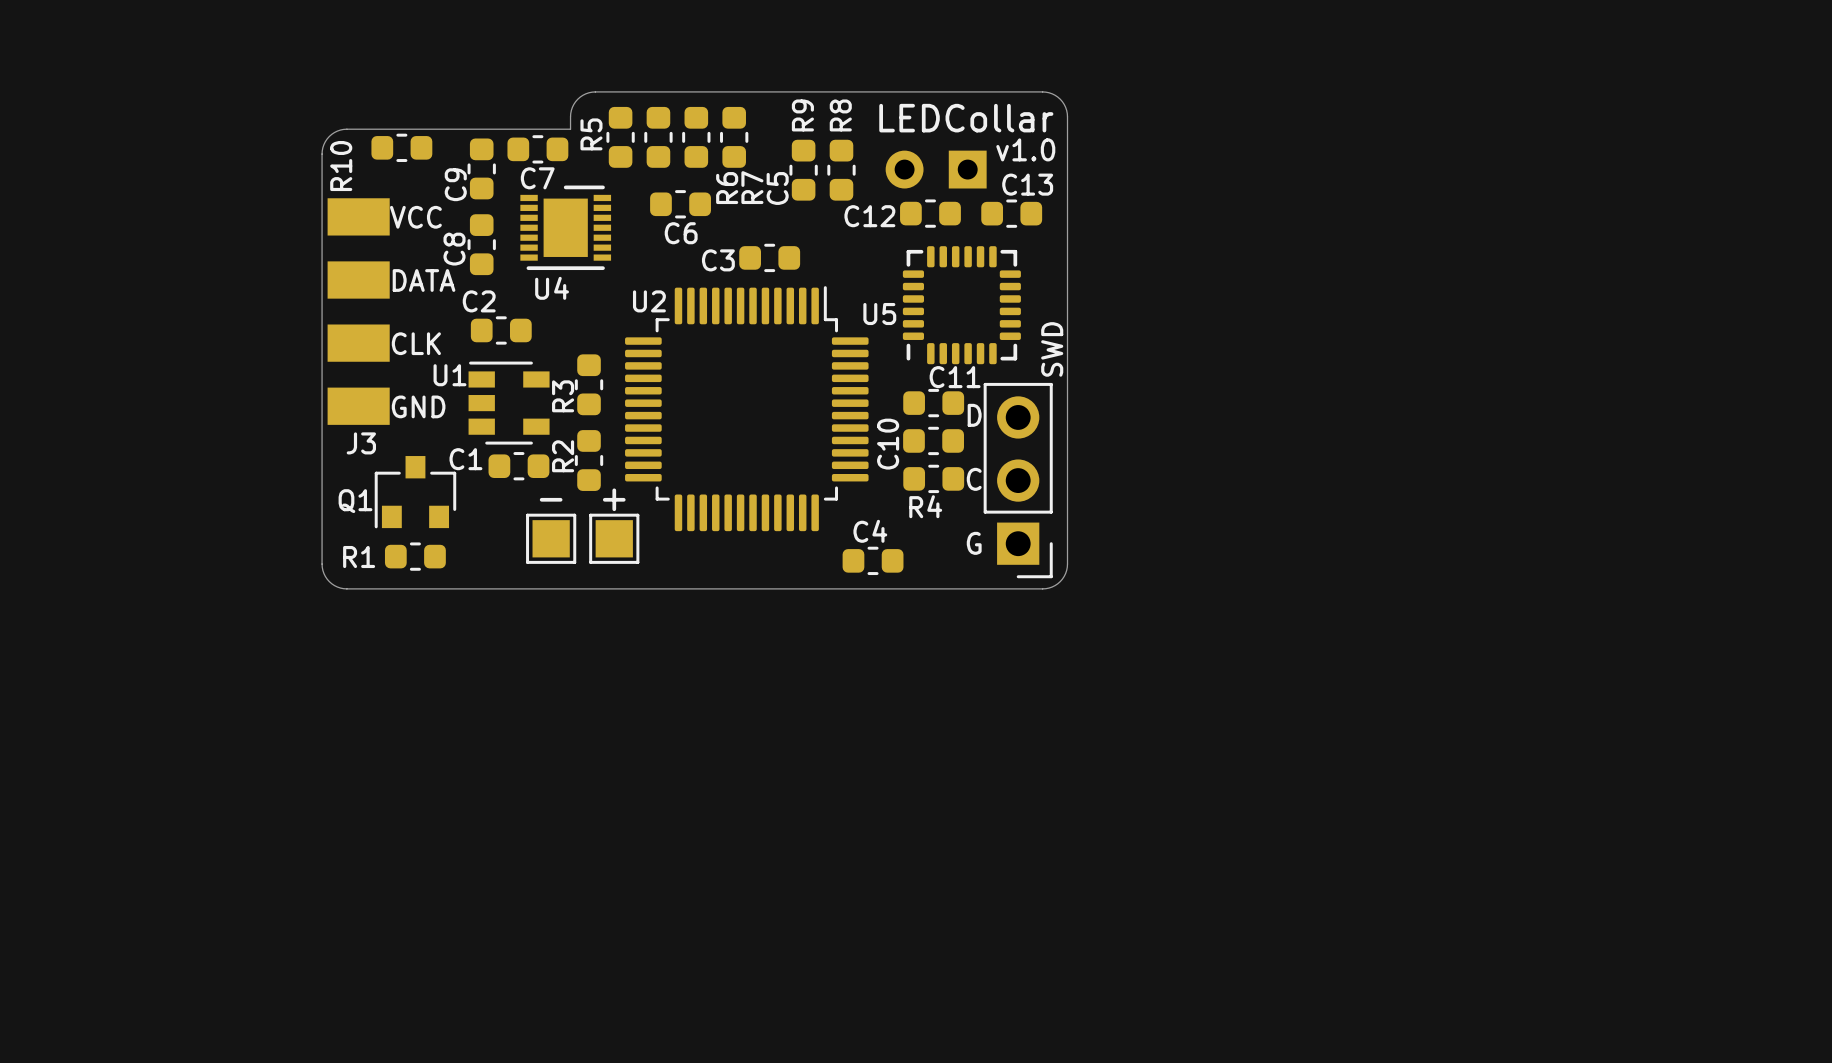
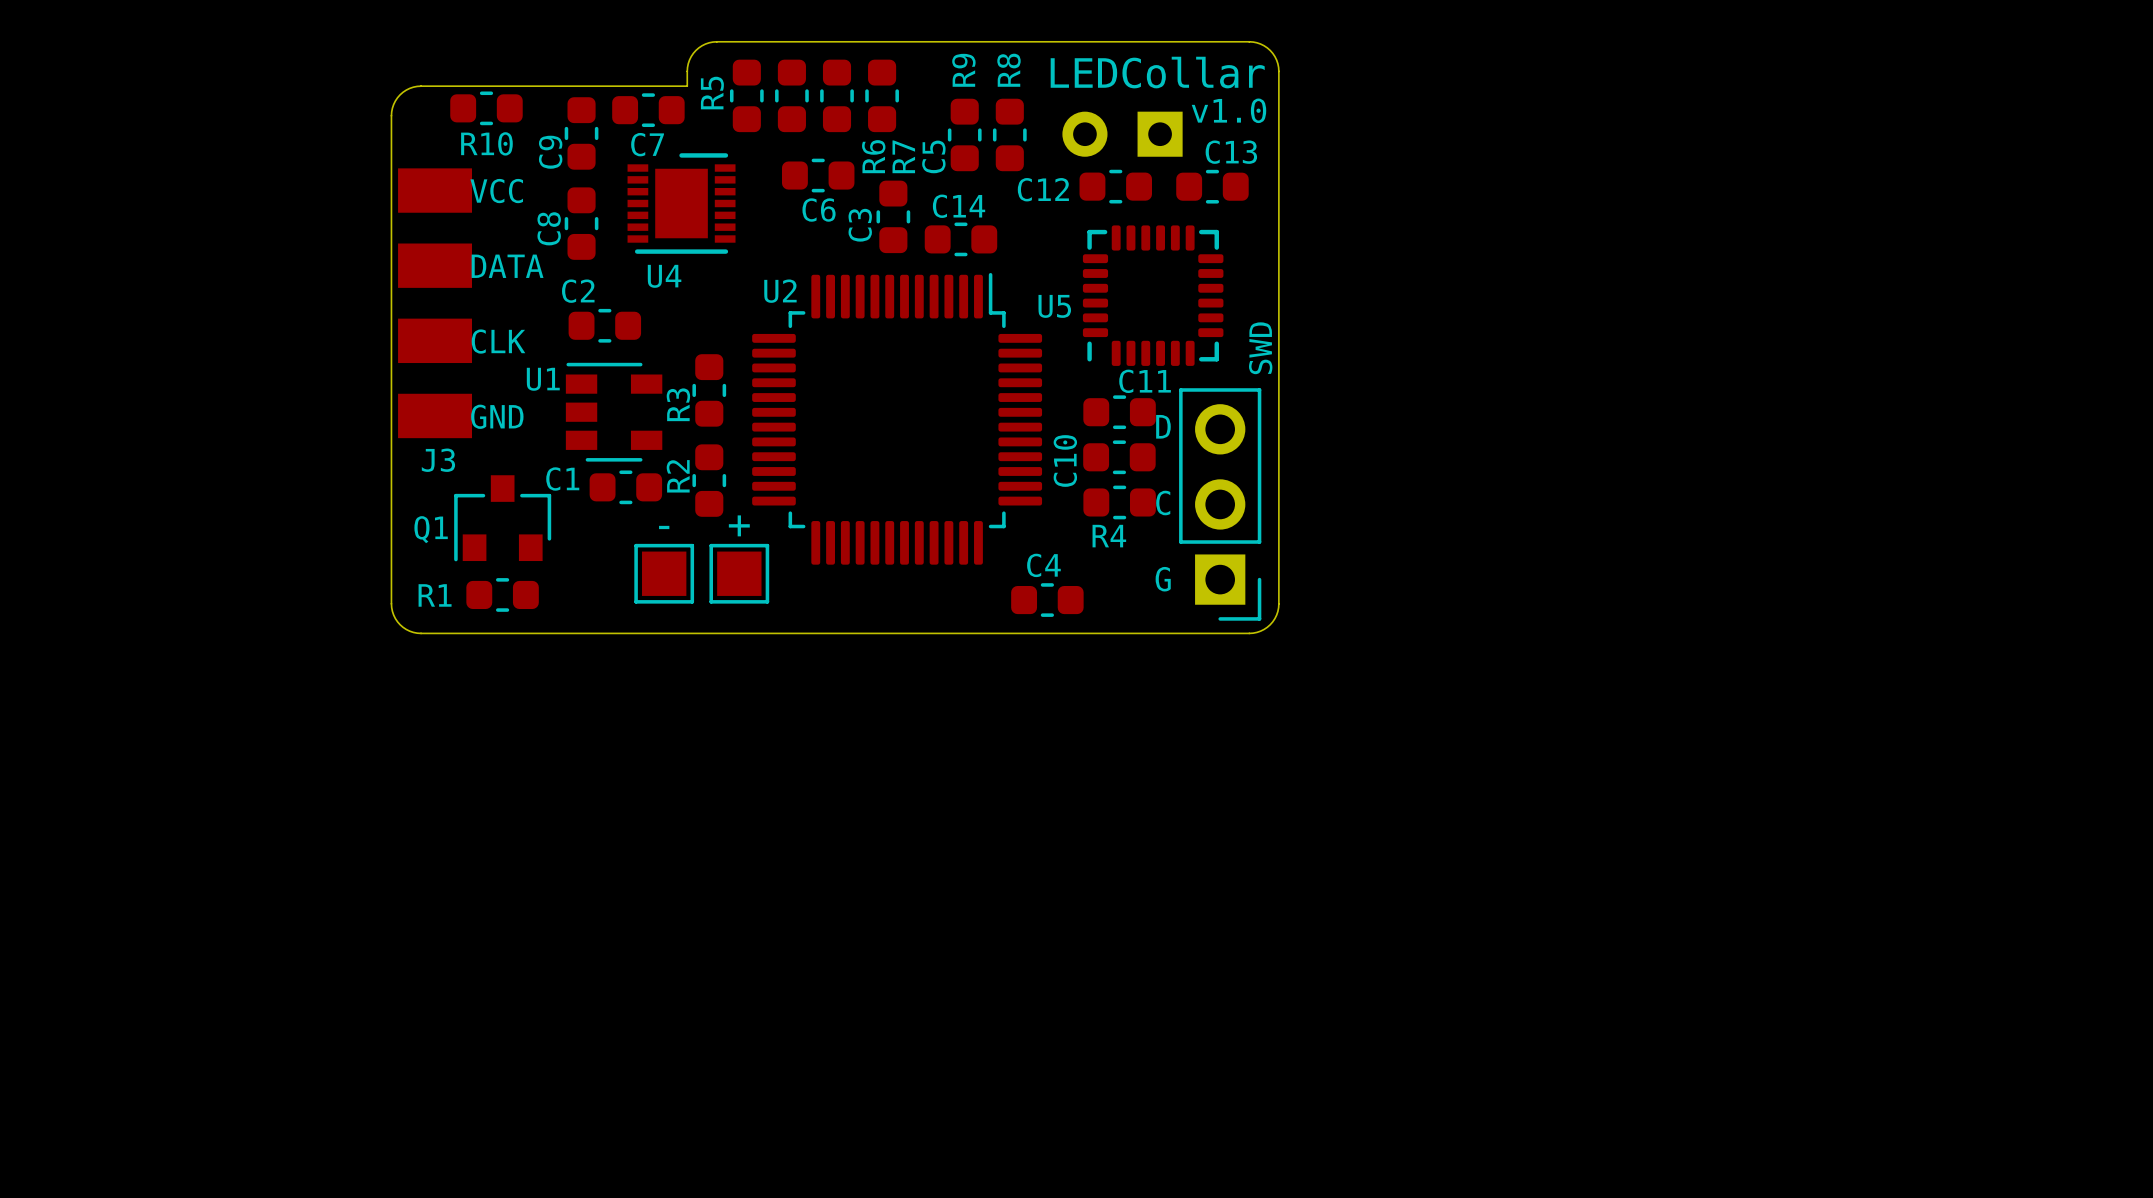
R10 name rotation: 0° (341, 166) -> 90° clockwise (486, 143)
C3 rotation: 0° (769, 257) -> 90° clockwise (893, 216)
C14: none -> (960, 239)

